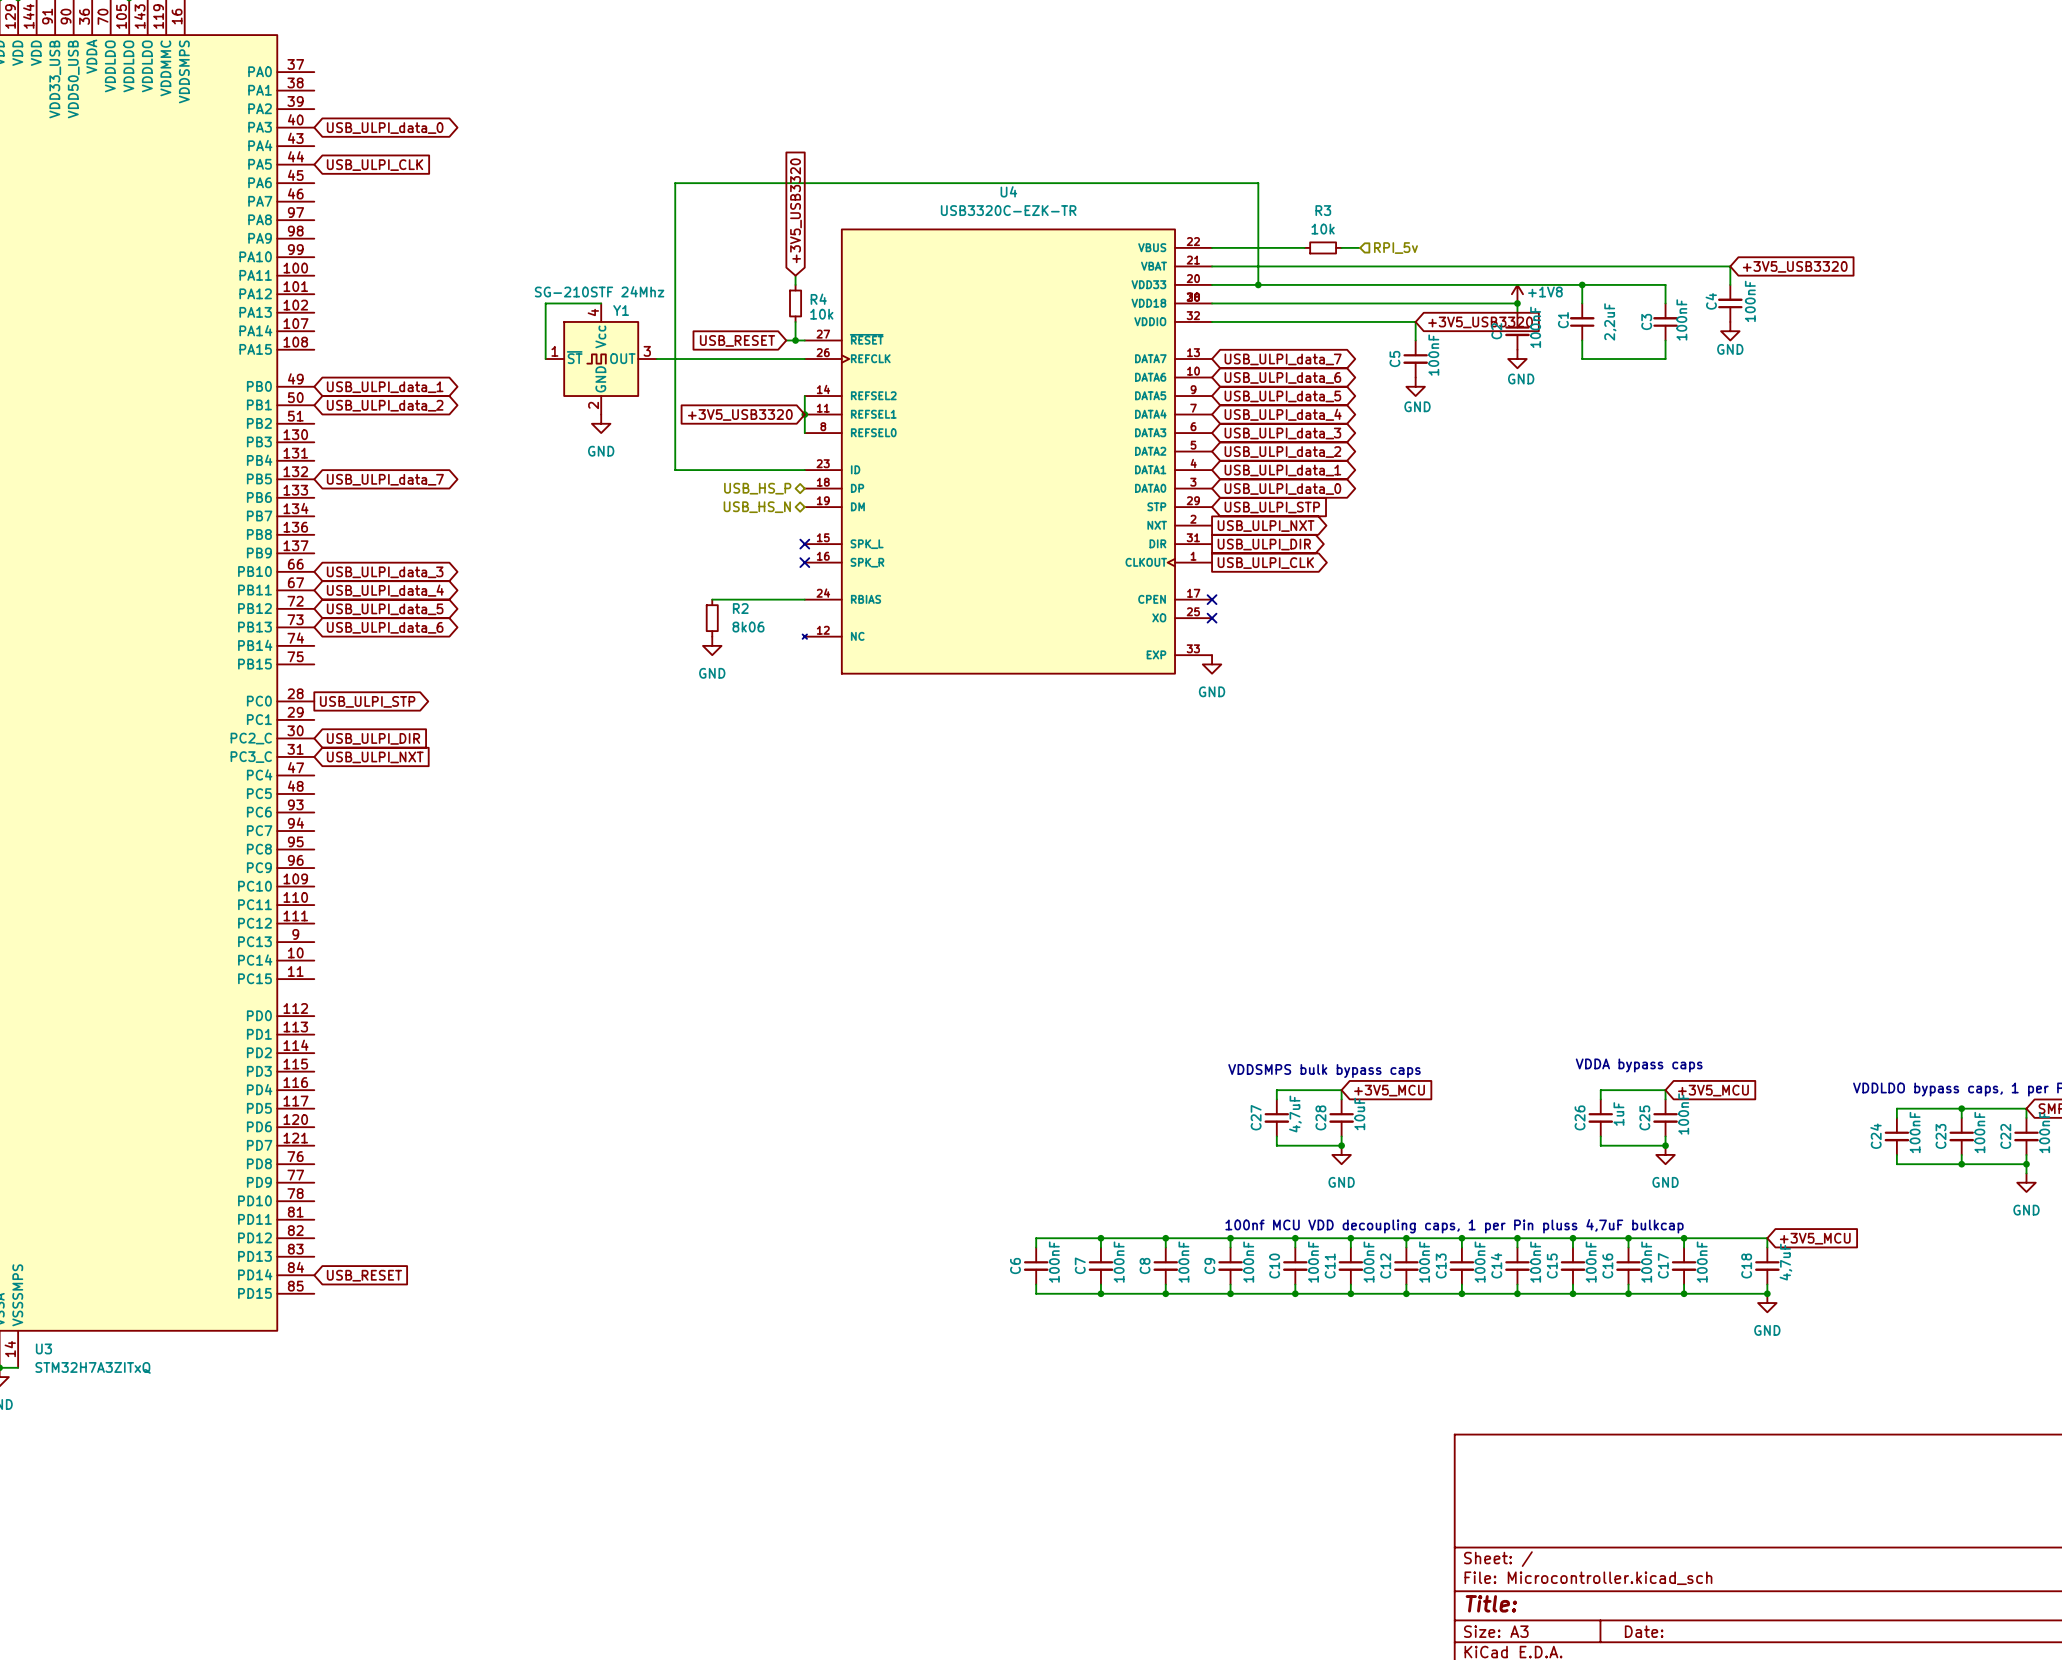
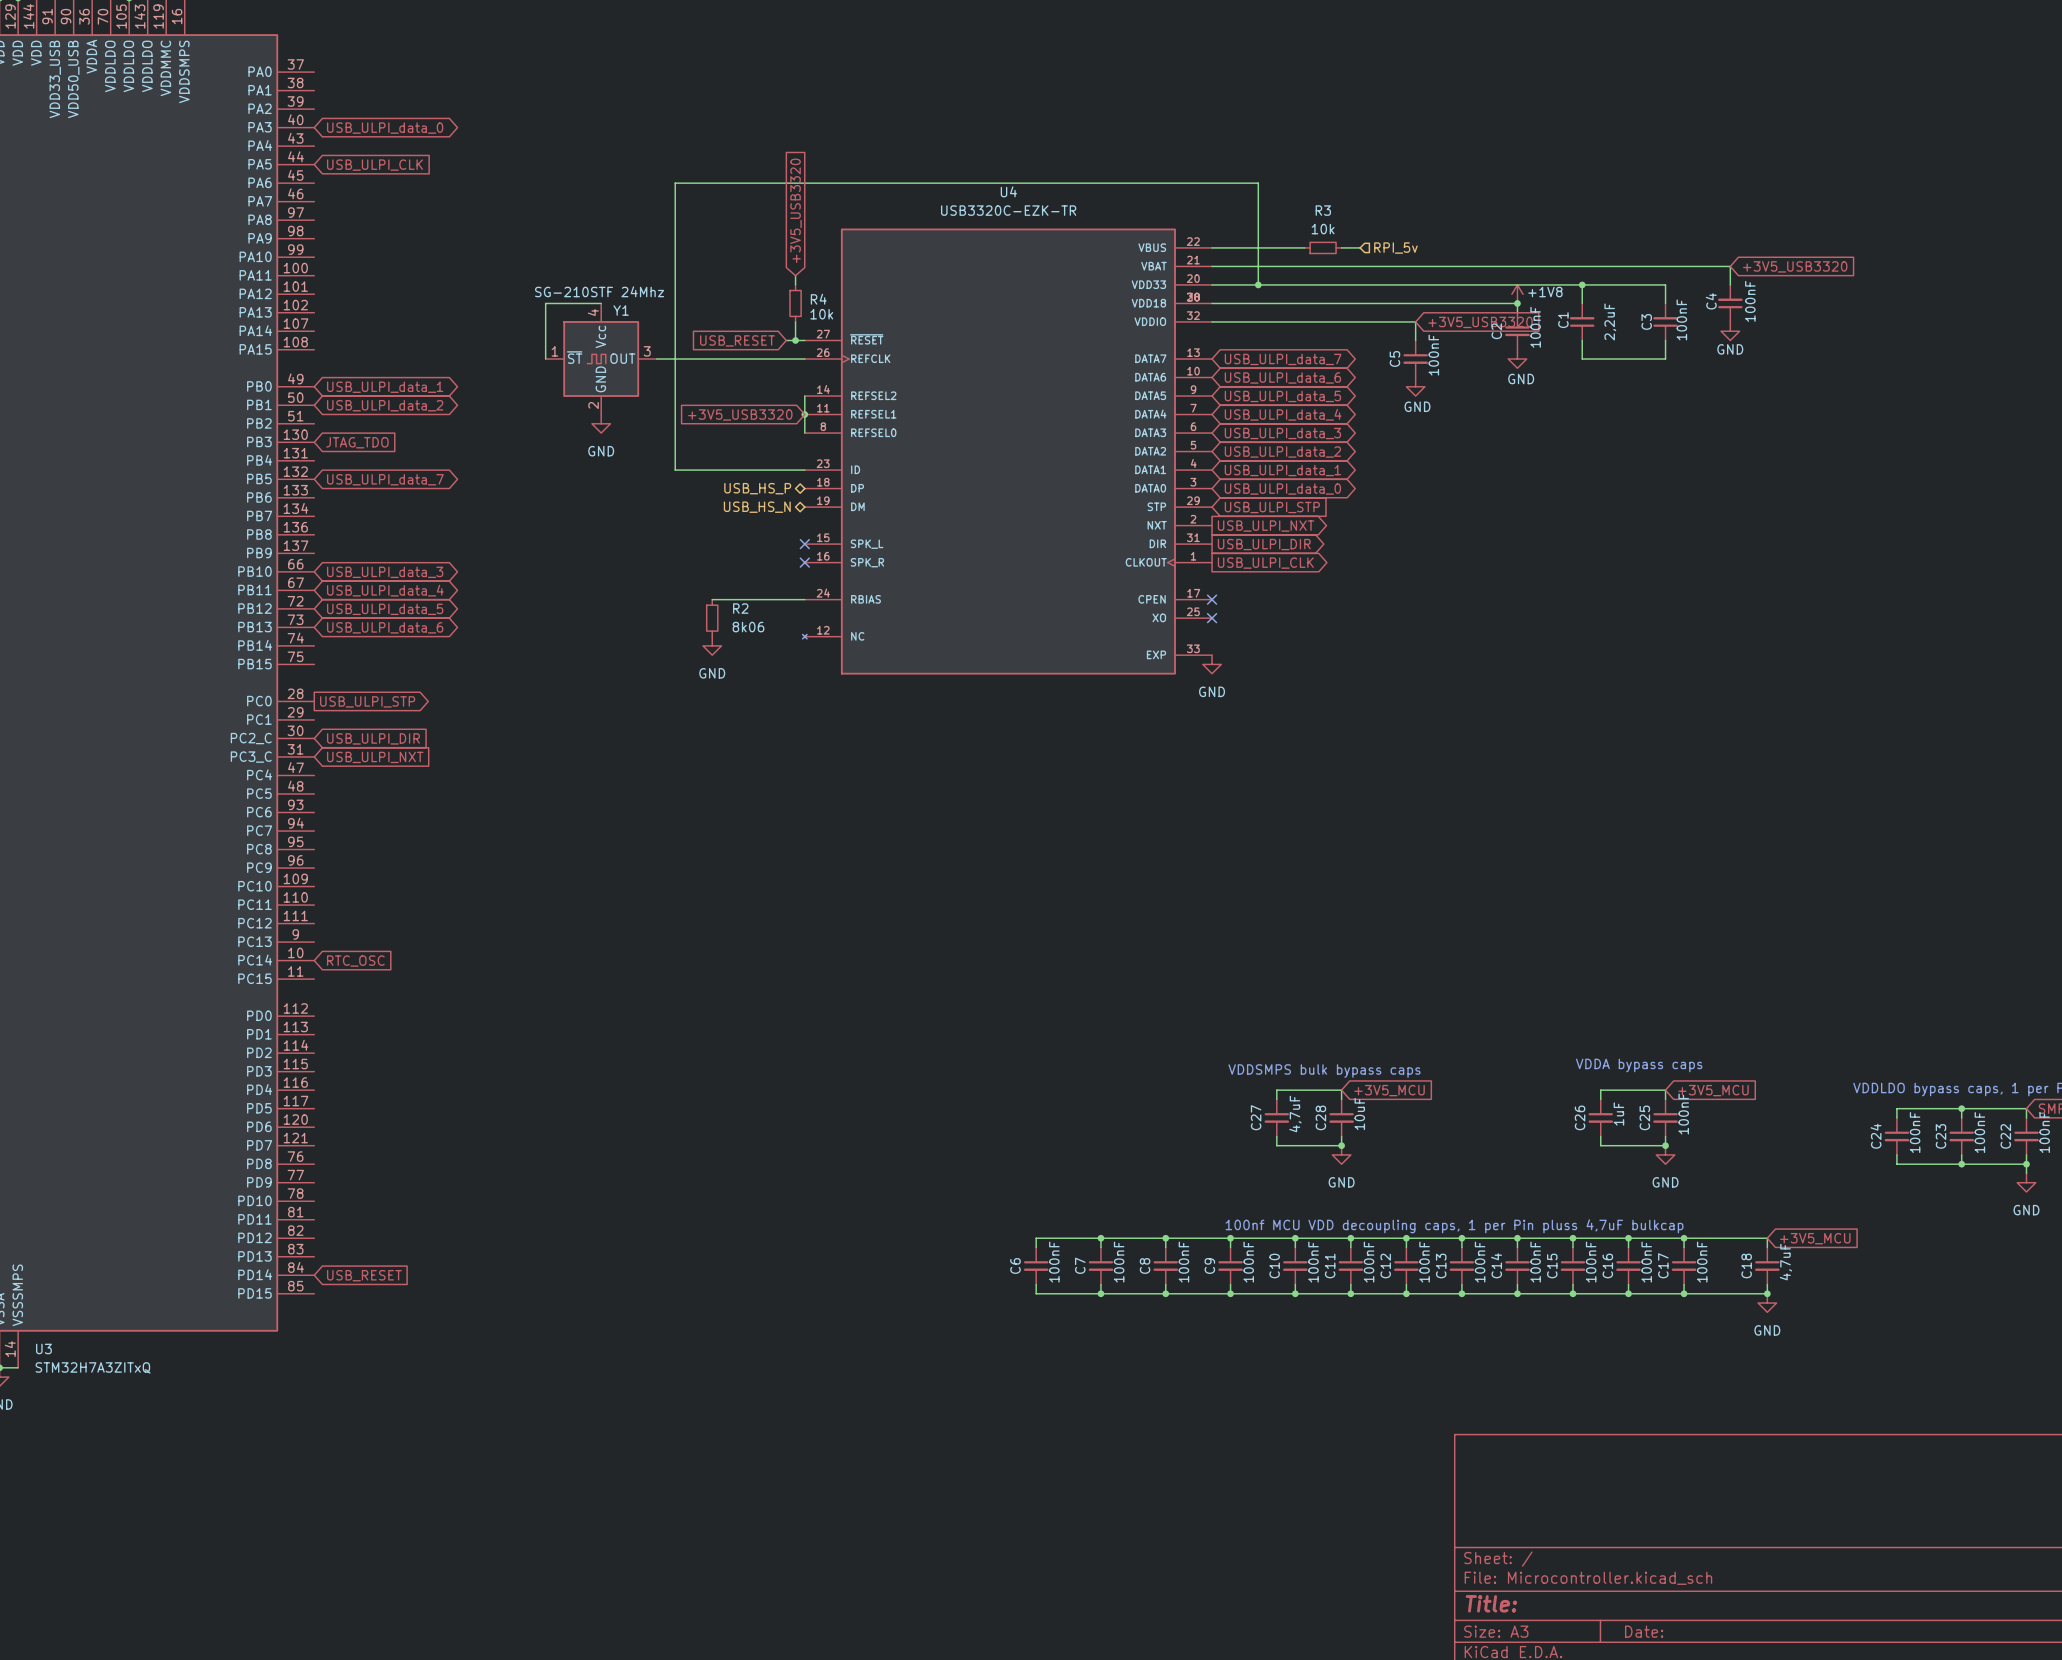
global label: none -> JTAG_TDO (357, 442)
global label: none -> RTC_OSC (355, 961)

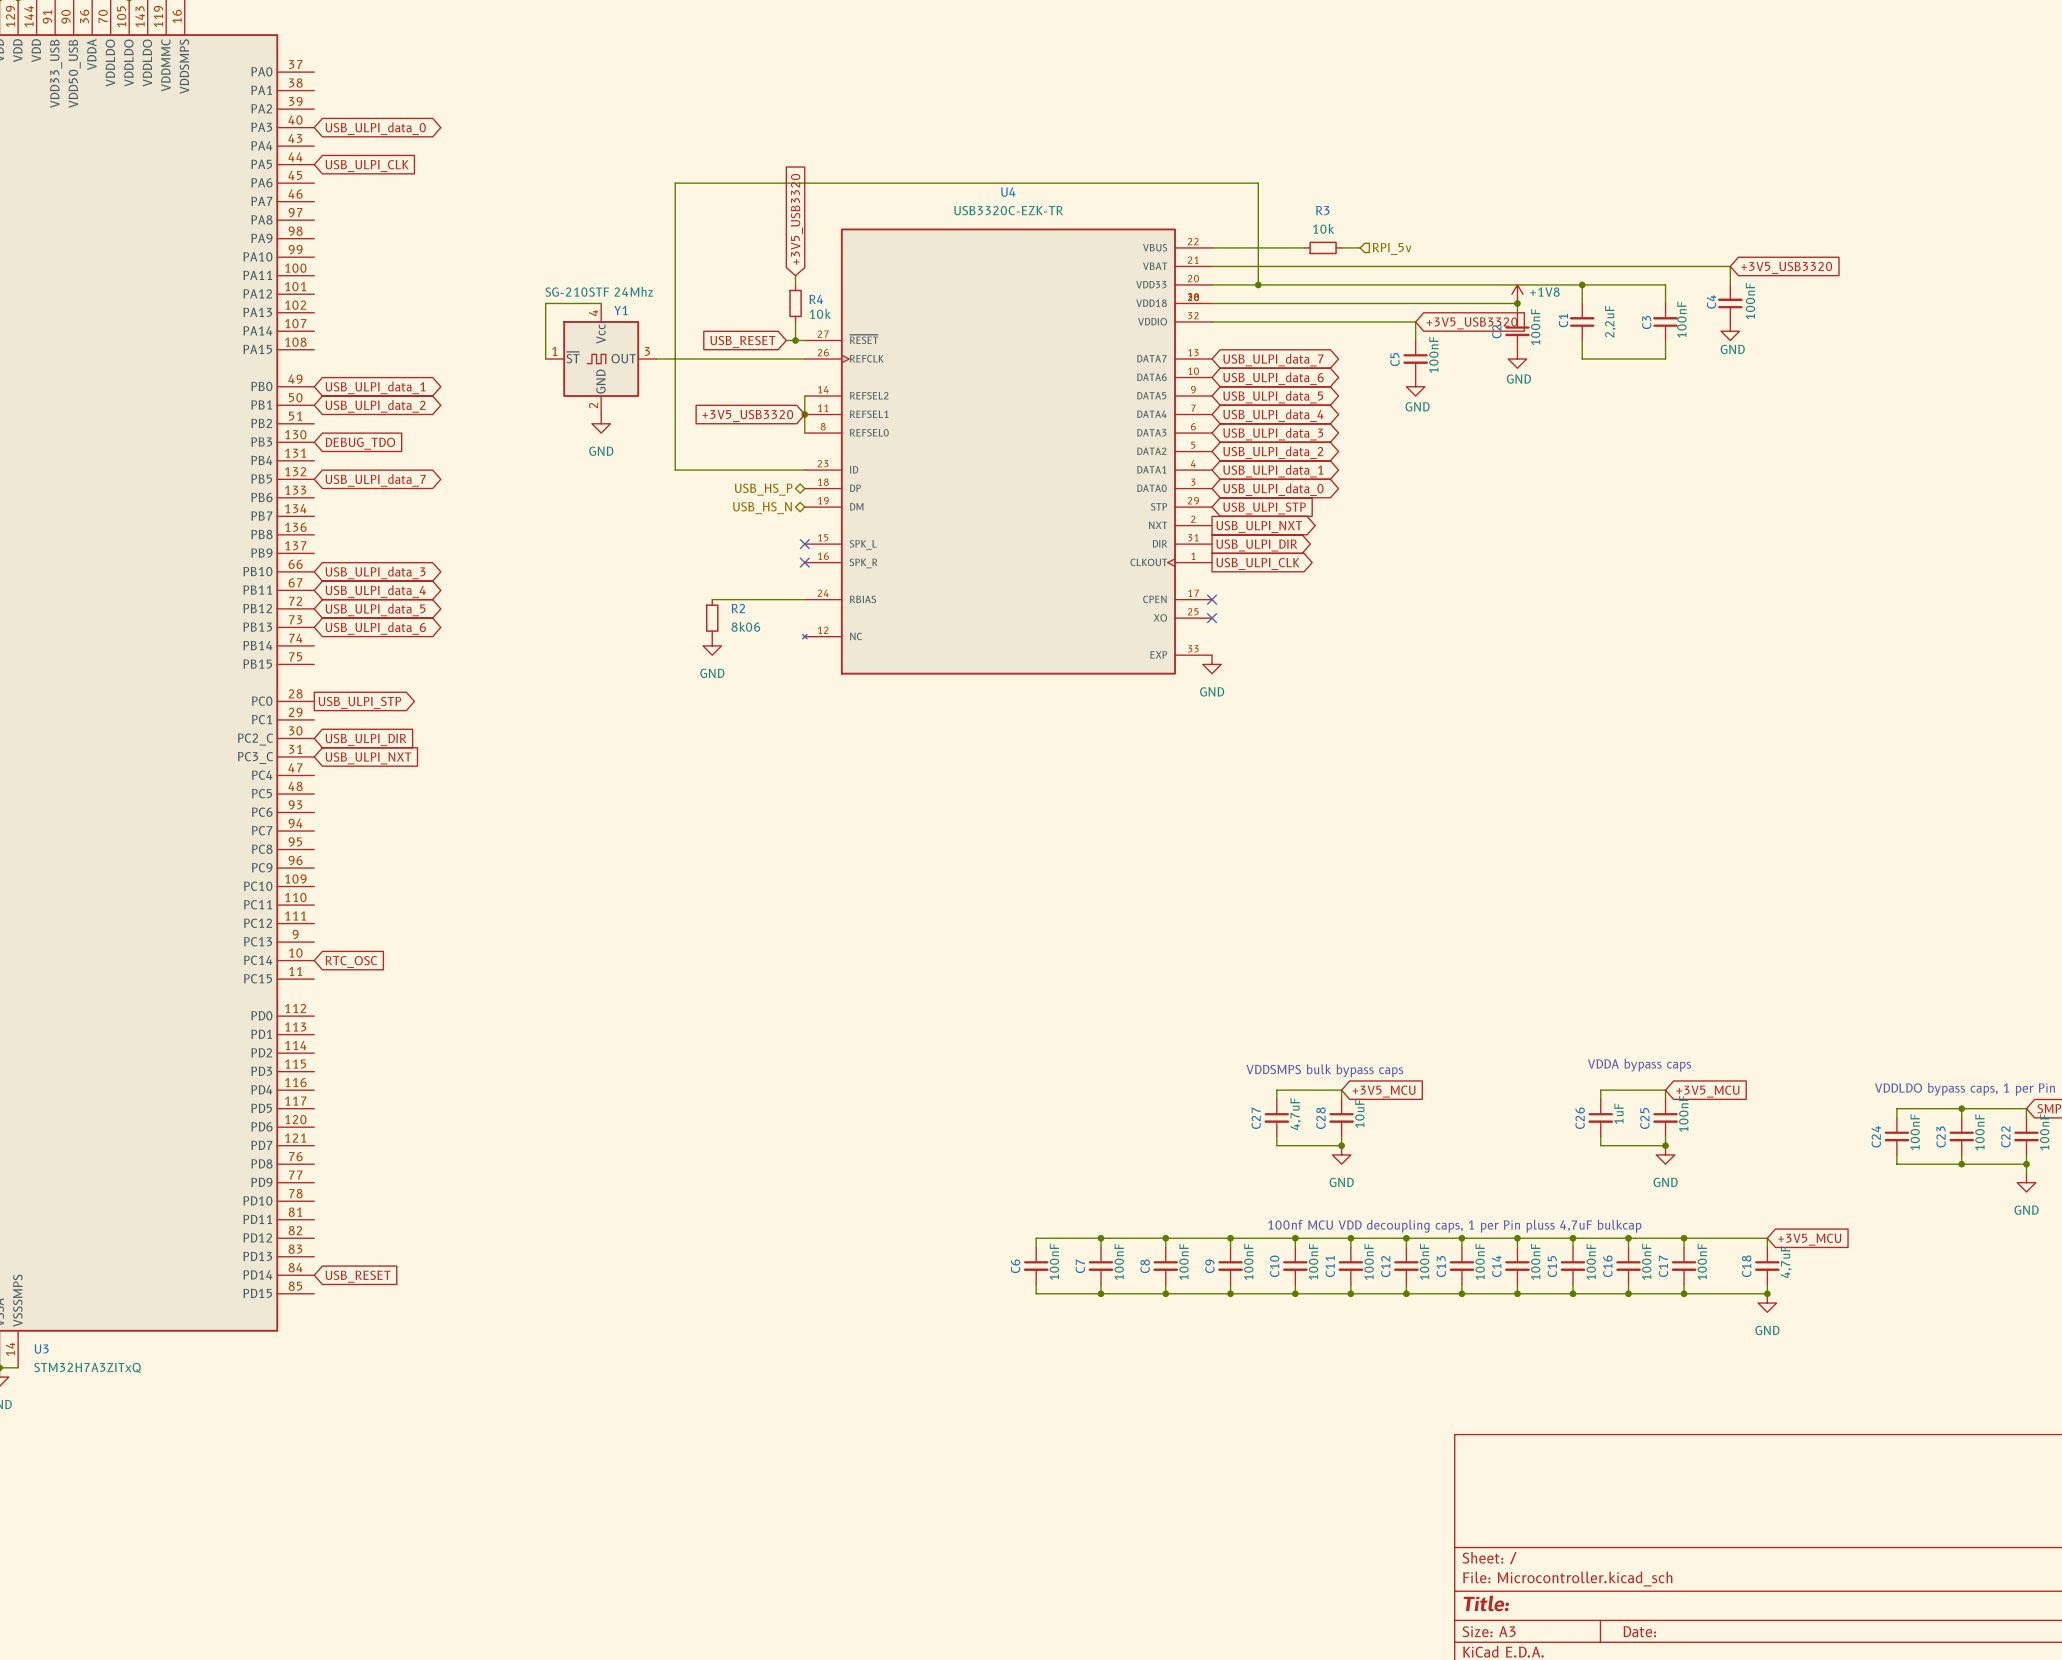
global label: JTAG_TDO (357, 442) -> DEBUG_TDO (360, 443)

